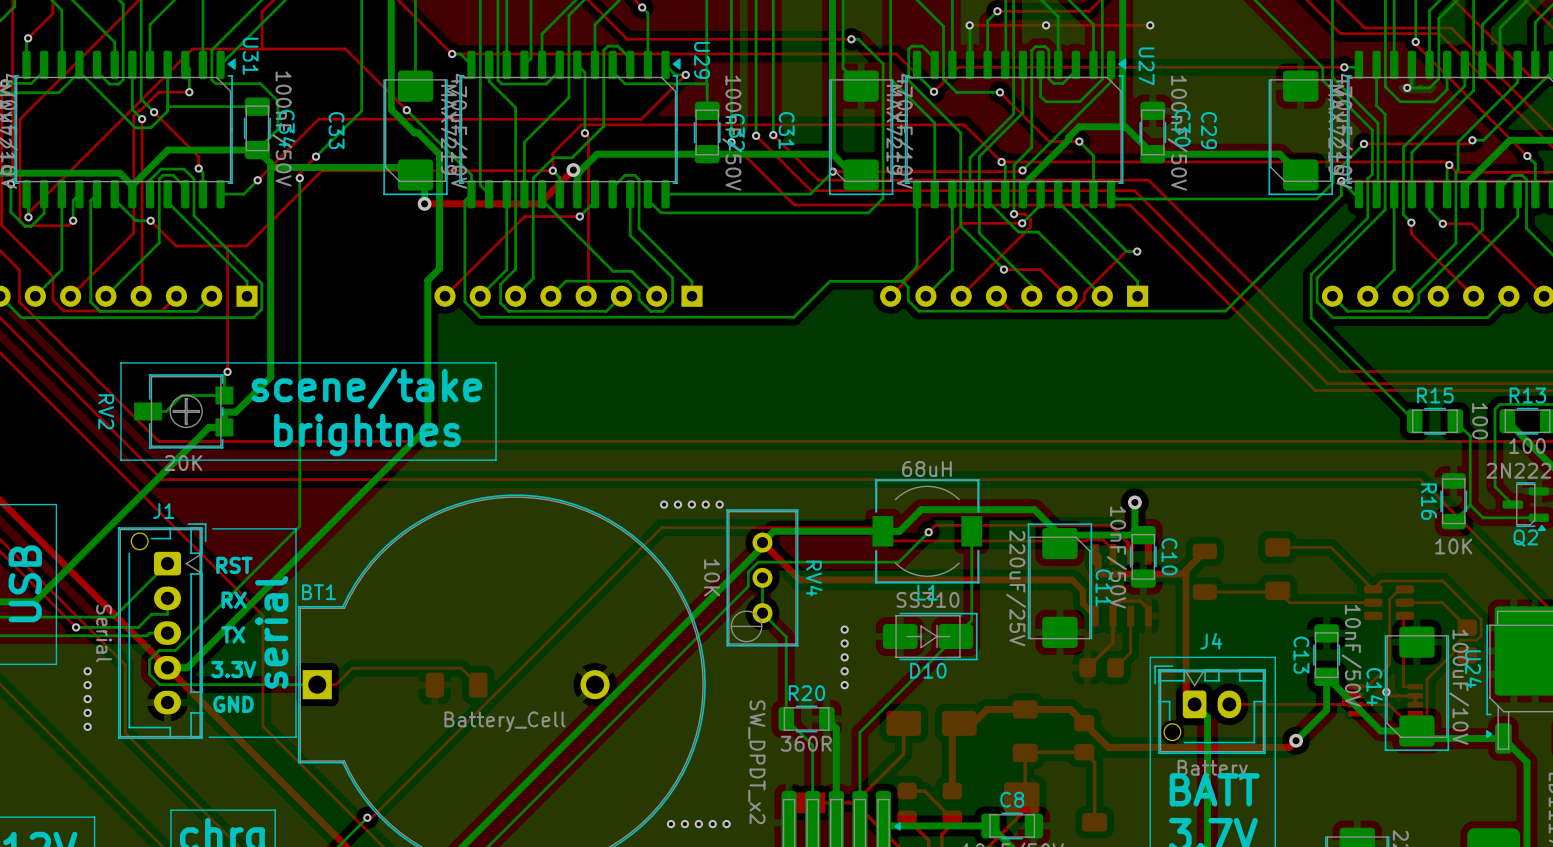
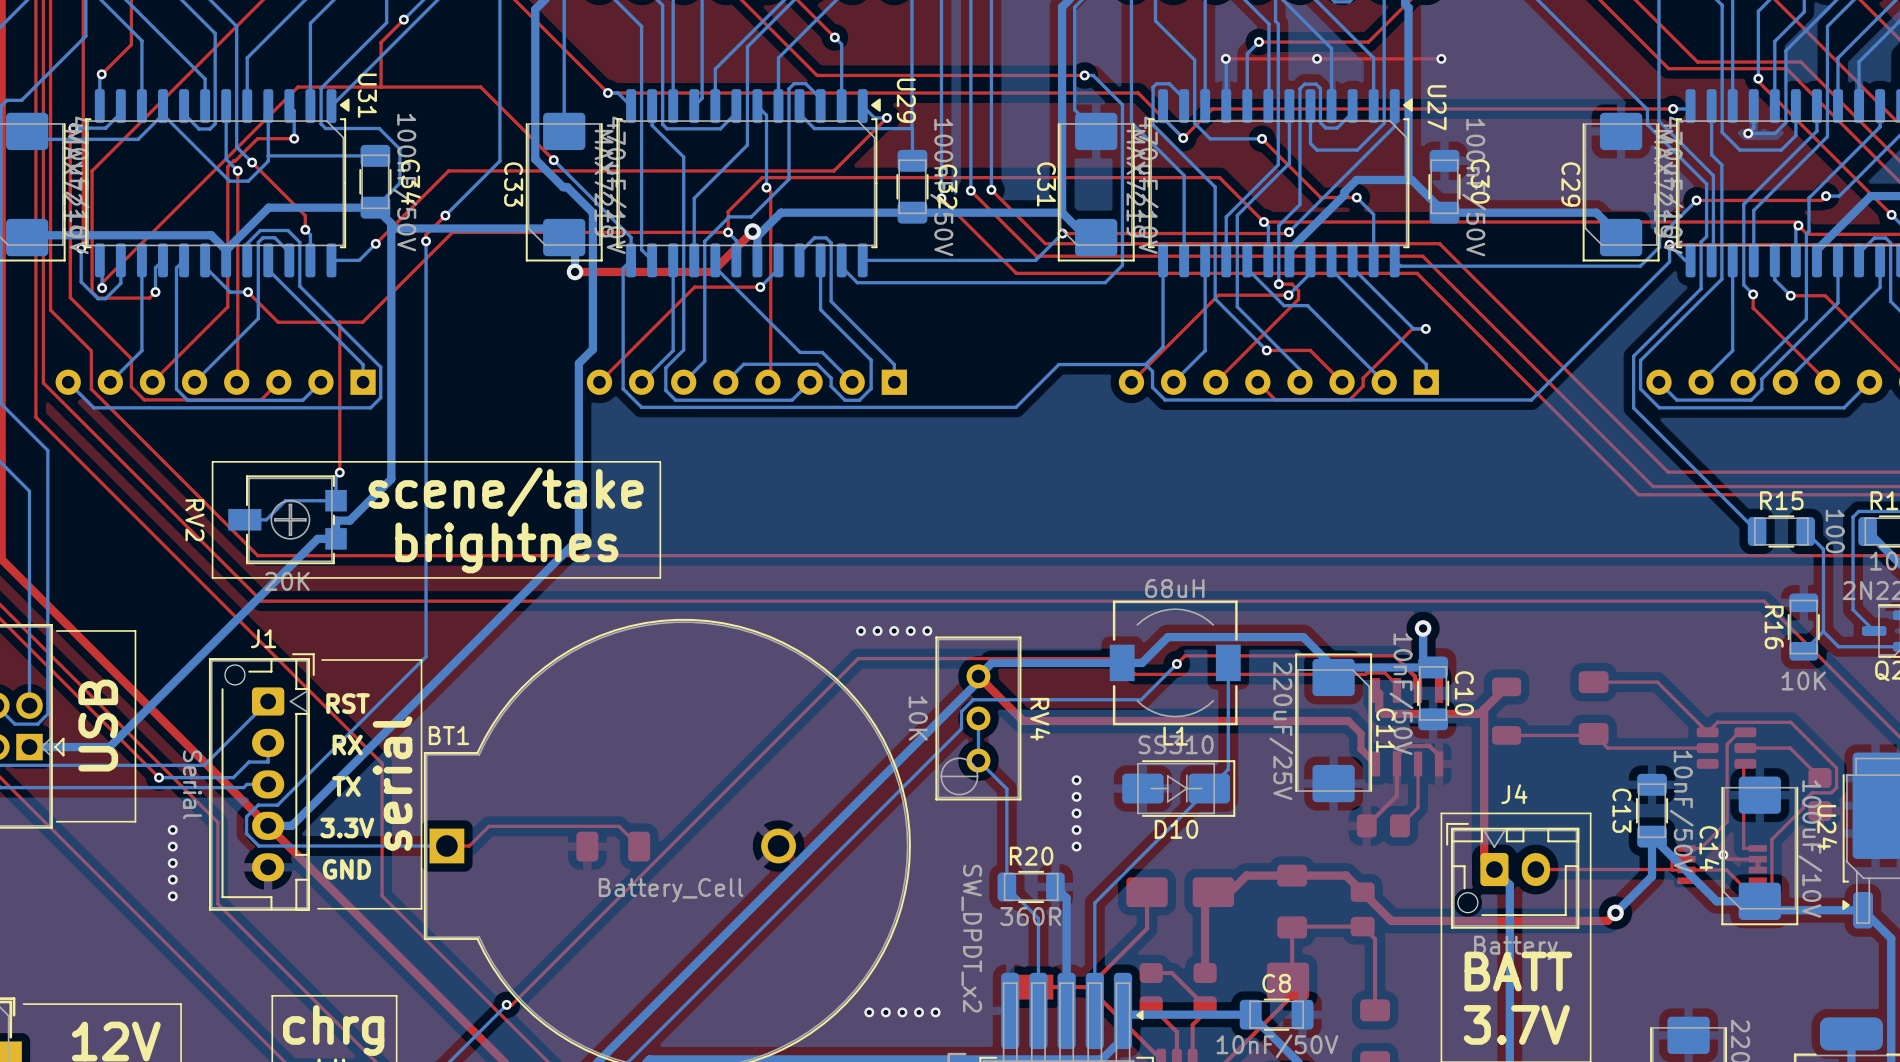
C33 name position: C33 (336, 130) -> C33 (513, 184)
C31 name position: C31 (786, 130) -> C31 (1046, 184)
C29 name position: C29 (1209, 130) -> C29 (1570, 184)

